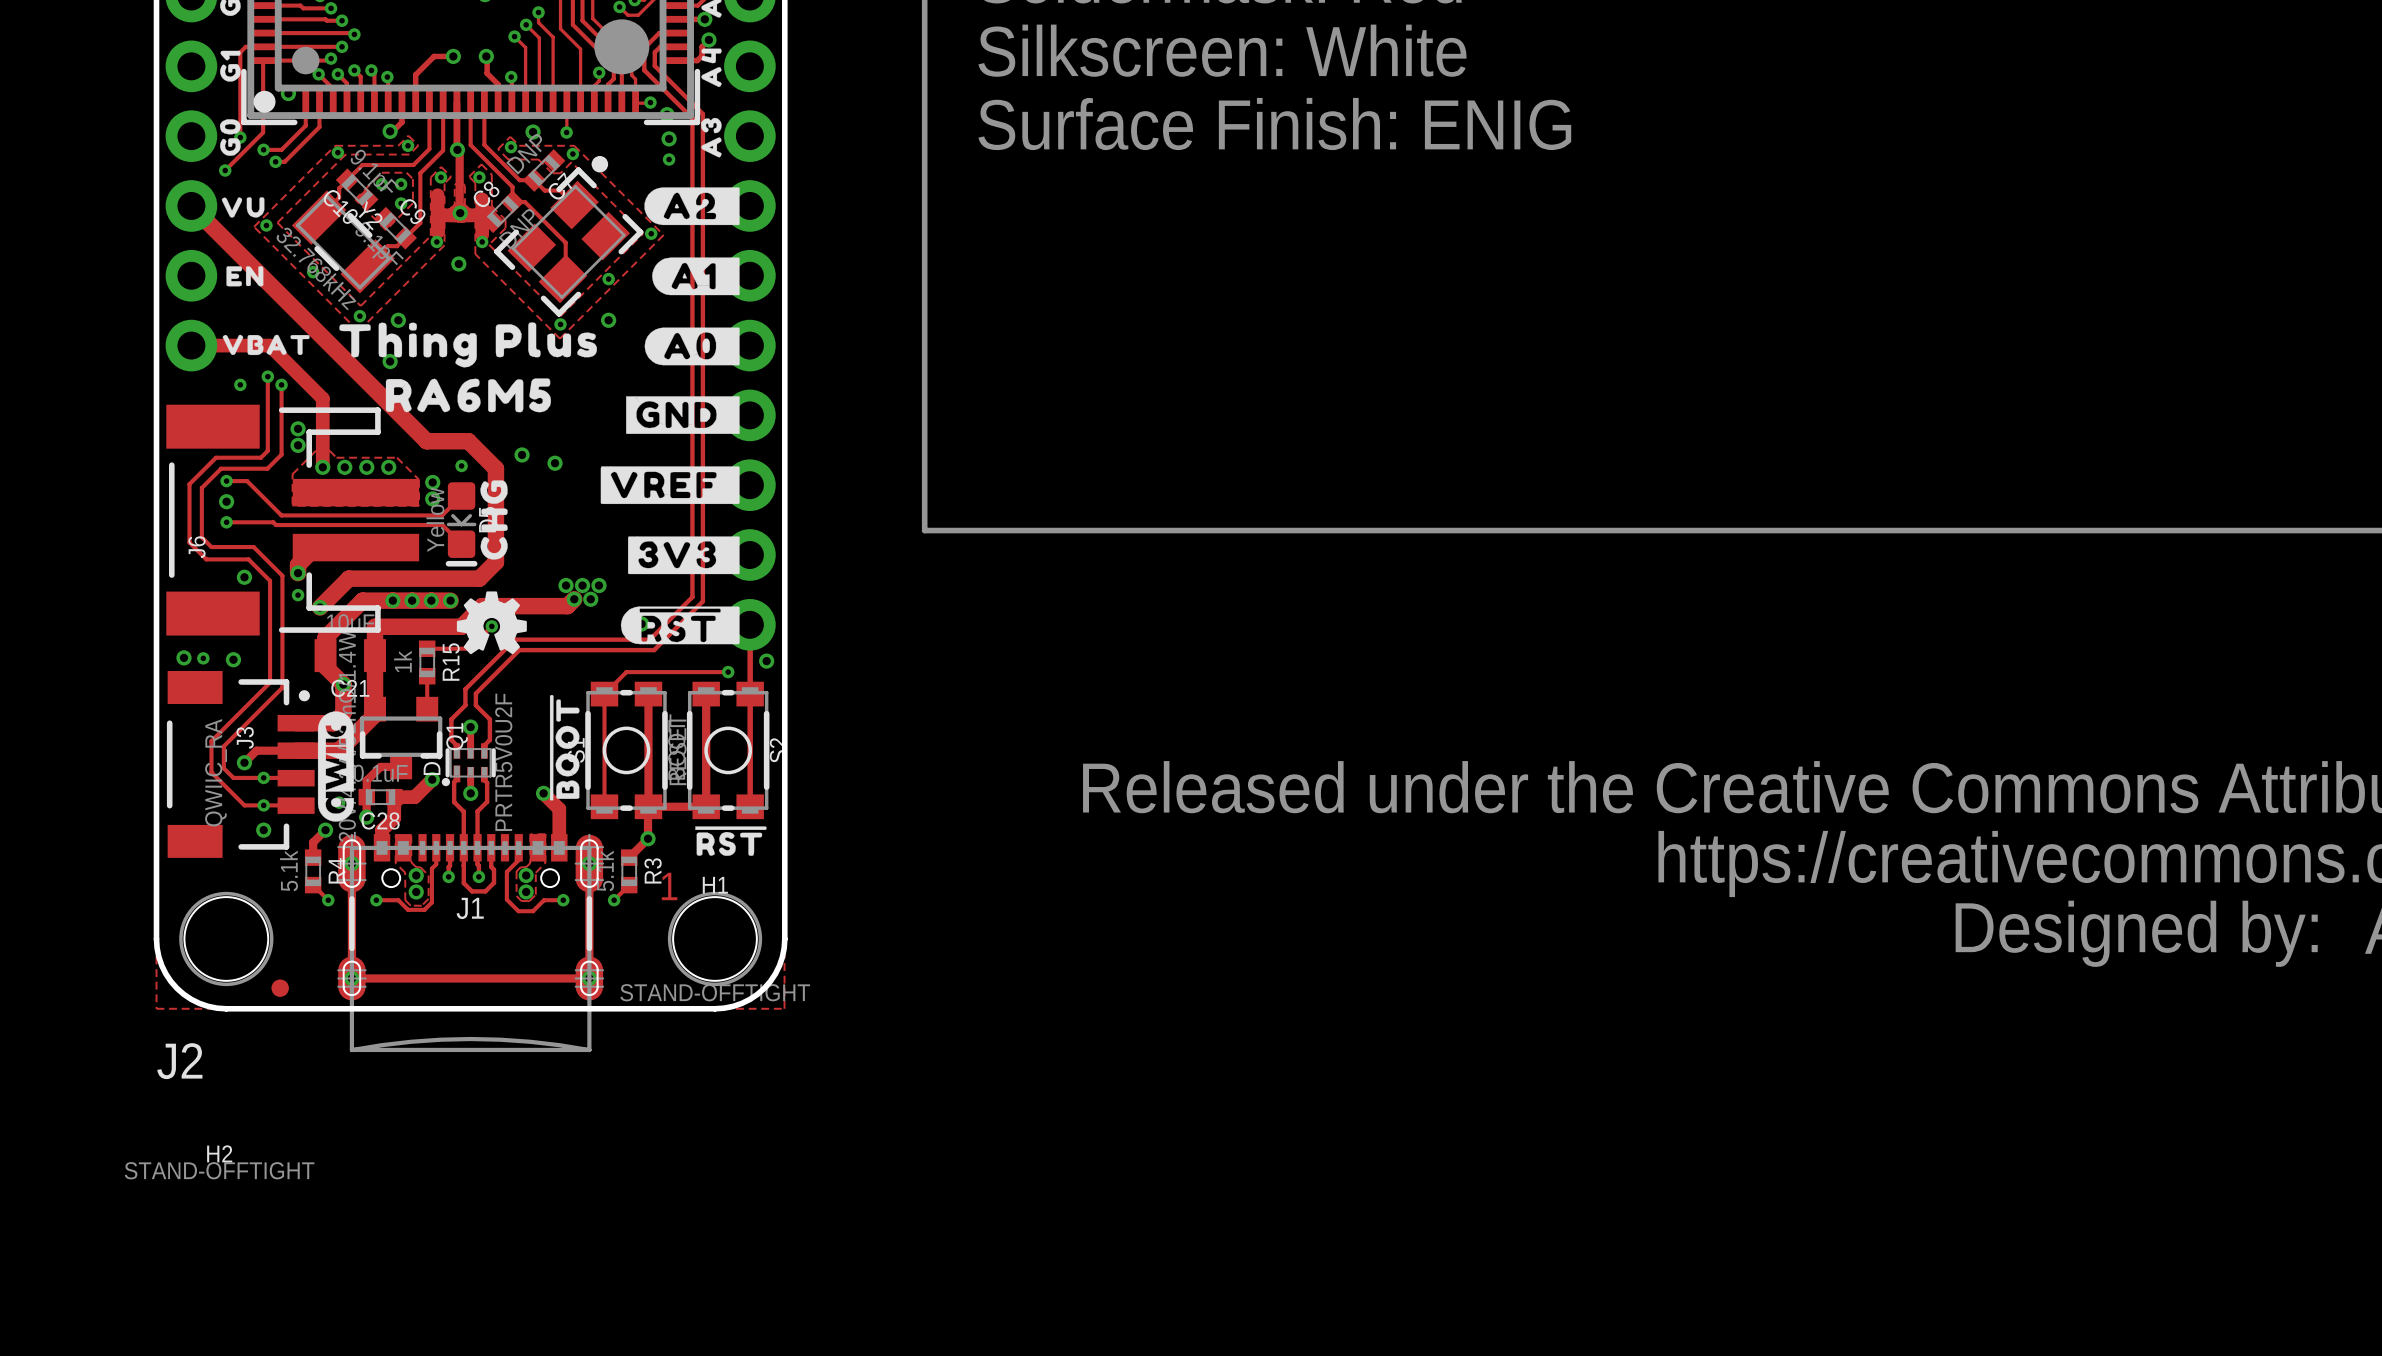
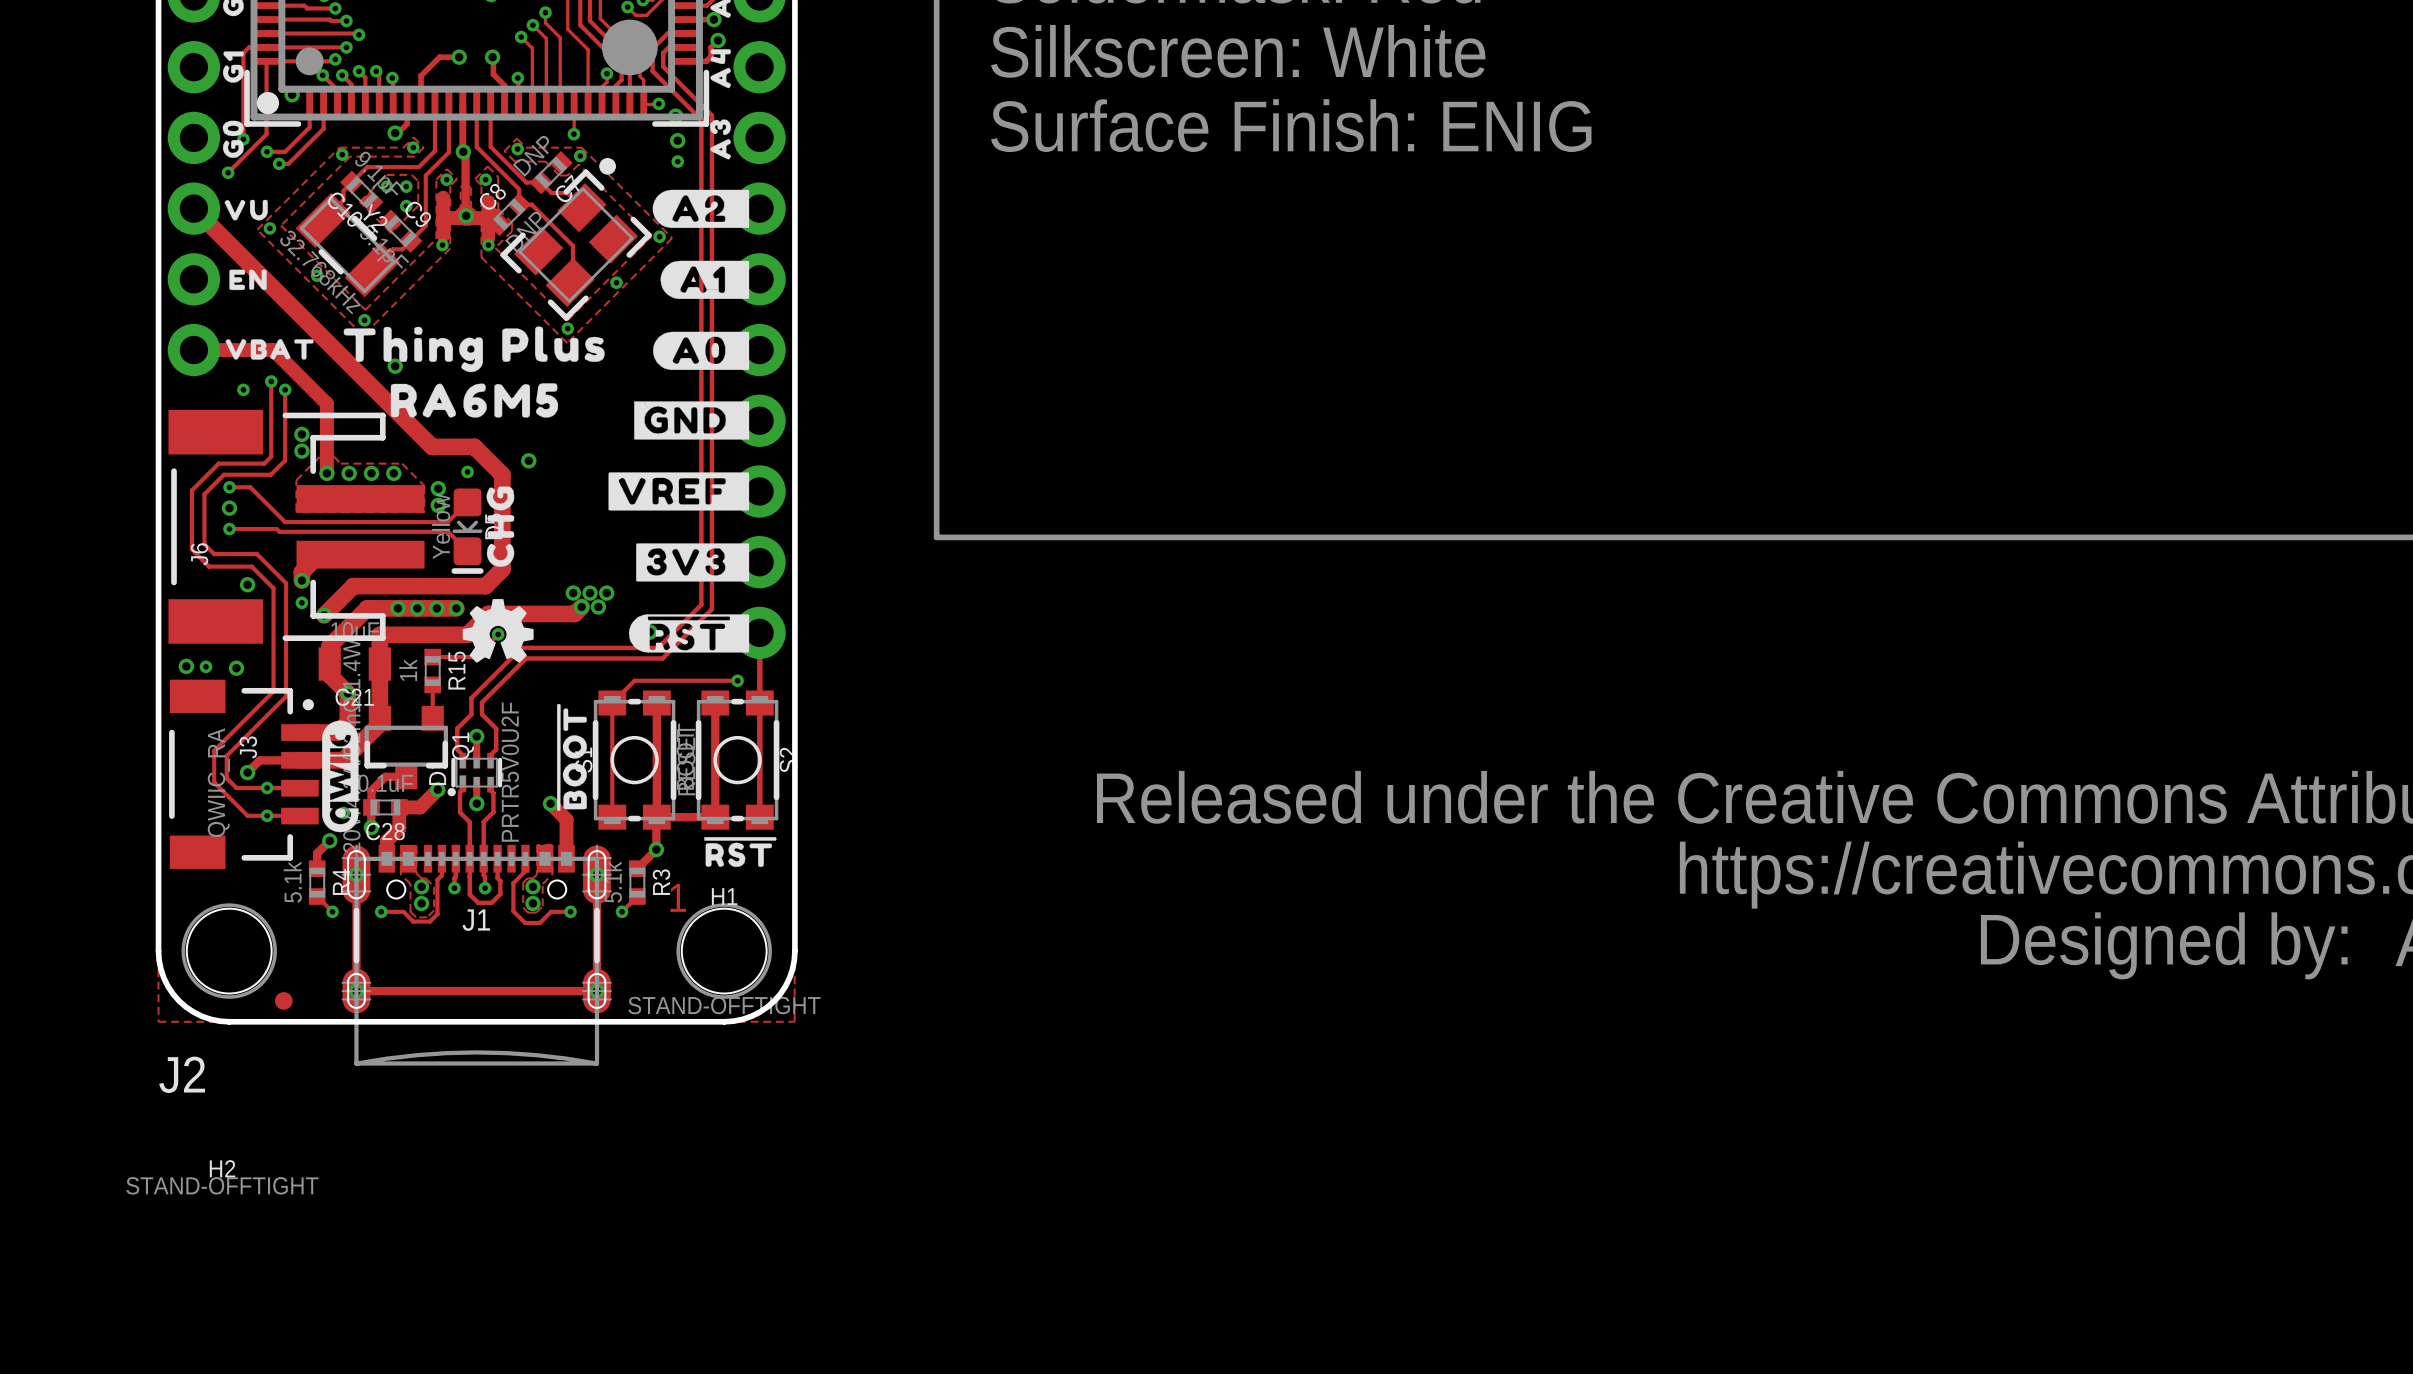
via: (533, 132) -> none
via: (458, 263) -> none
via: (398, 320) -> none
via: (608, 320) -> none
via: (555, 463) -> none
via: (766, 661) -> none
via: (263, 830) -> none

